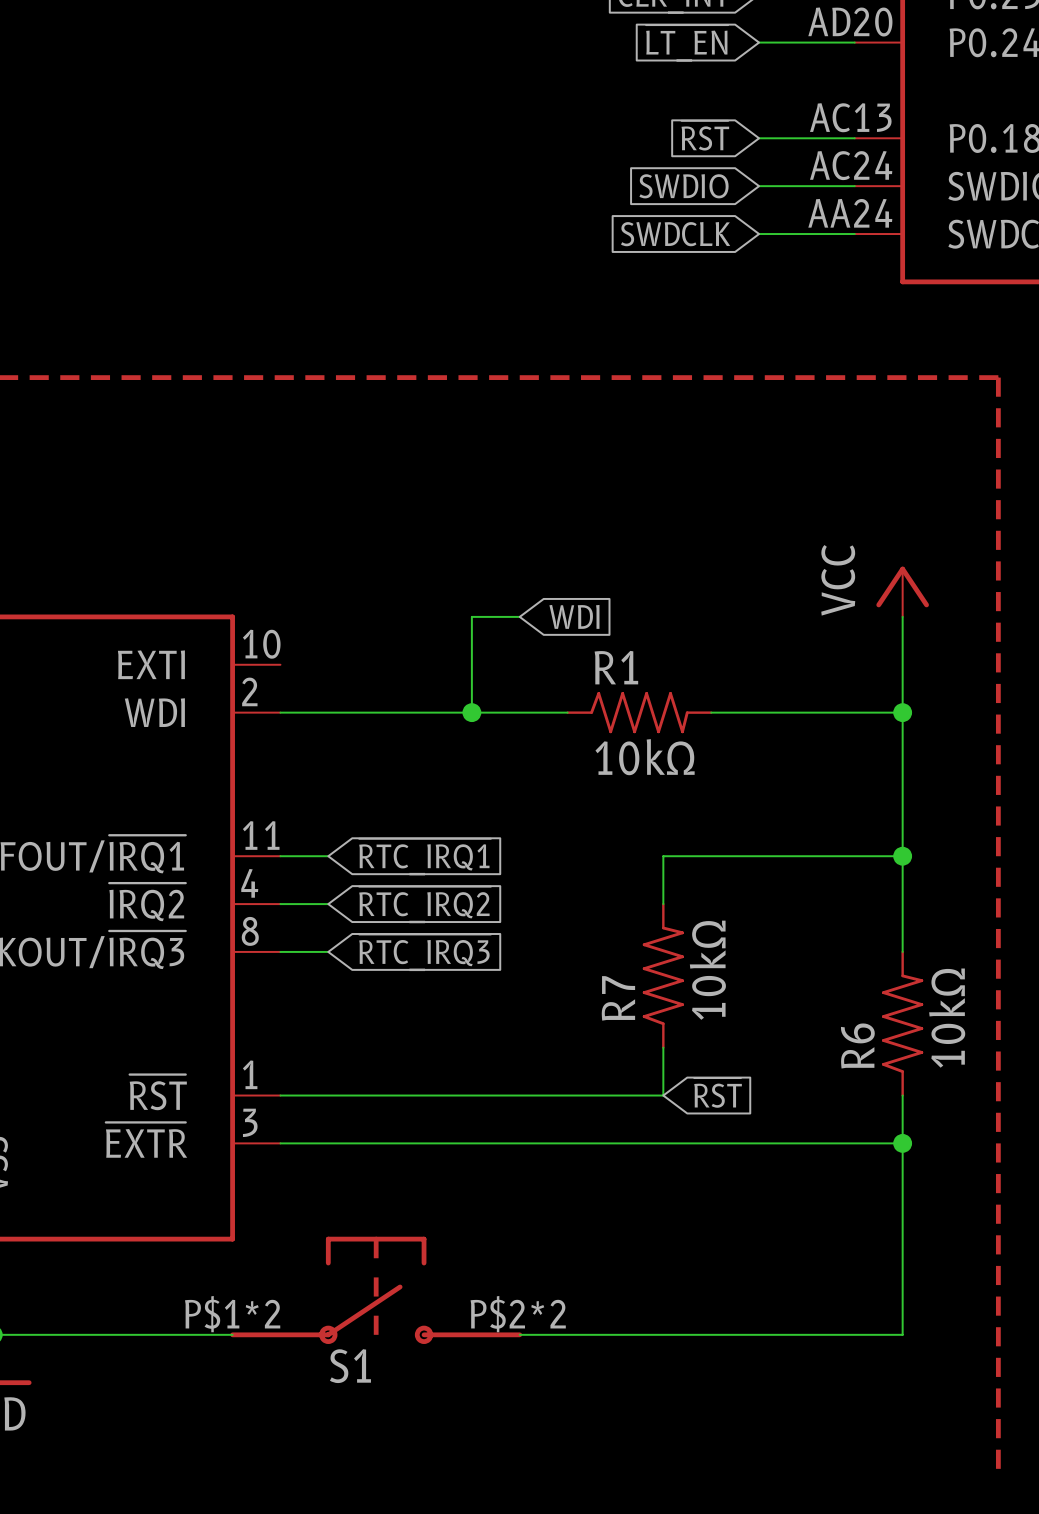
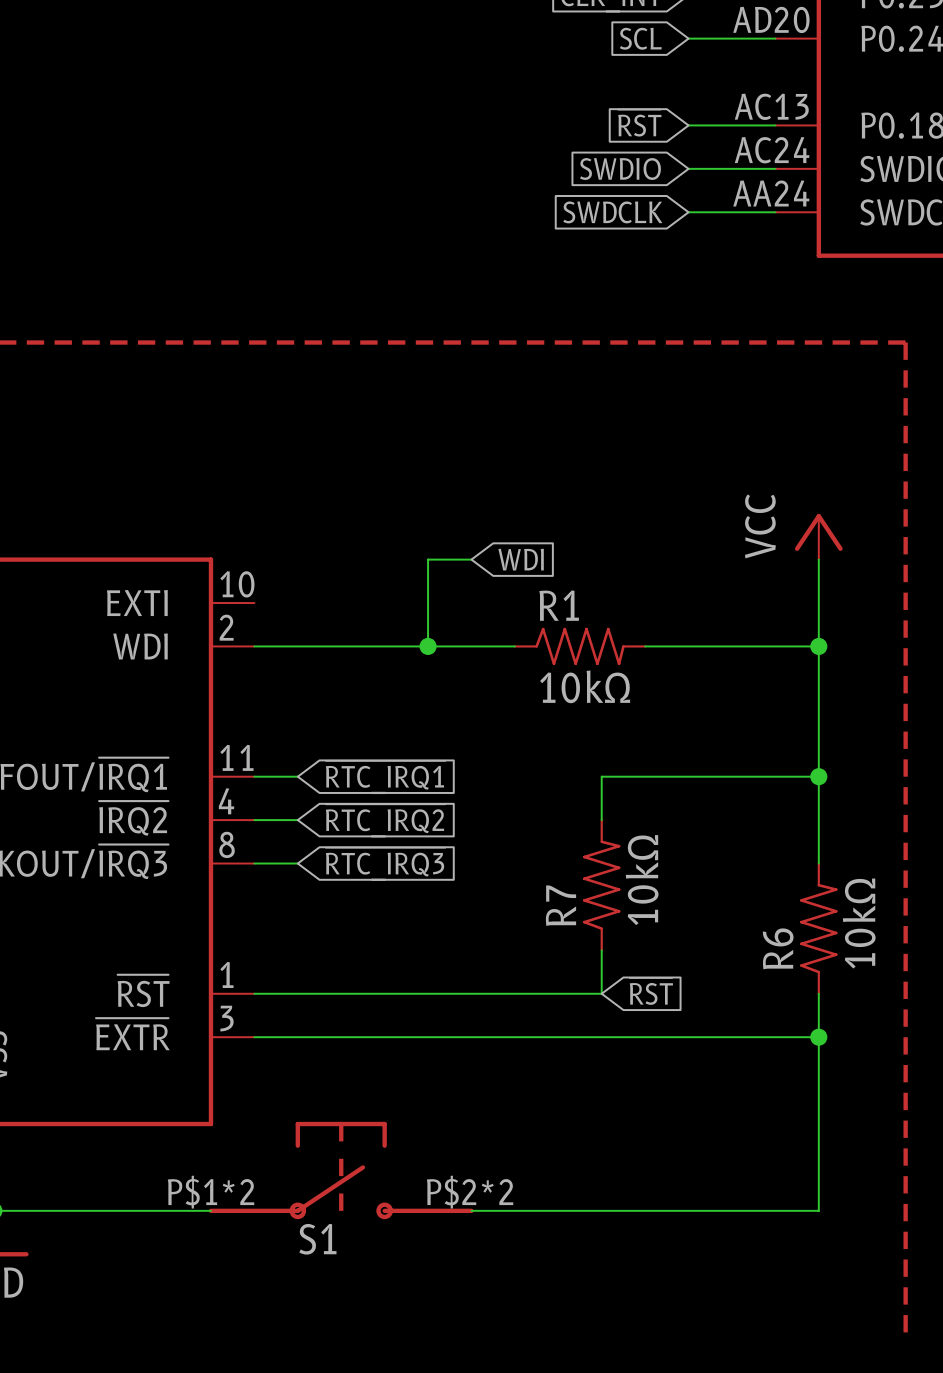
global label: ~{LT_EN} (687, 43) -> SCL (640, 38)

